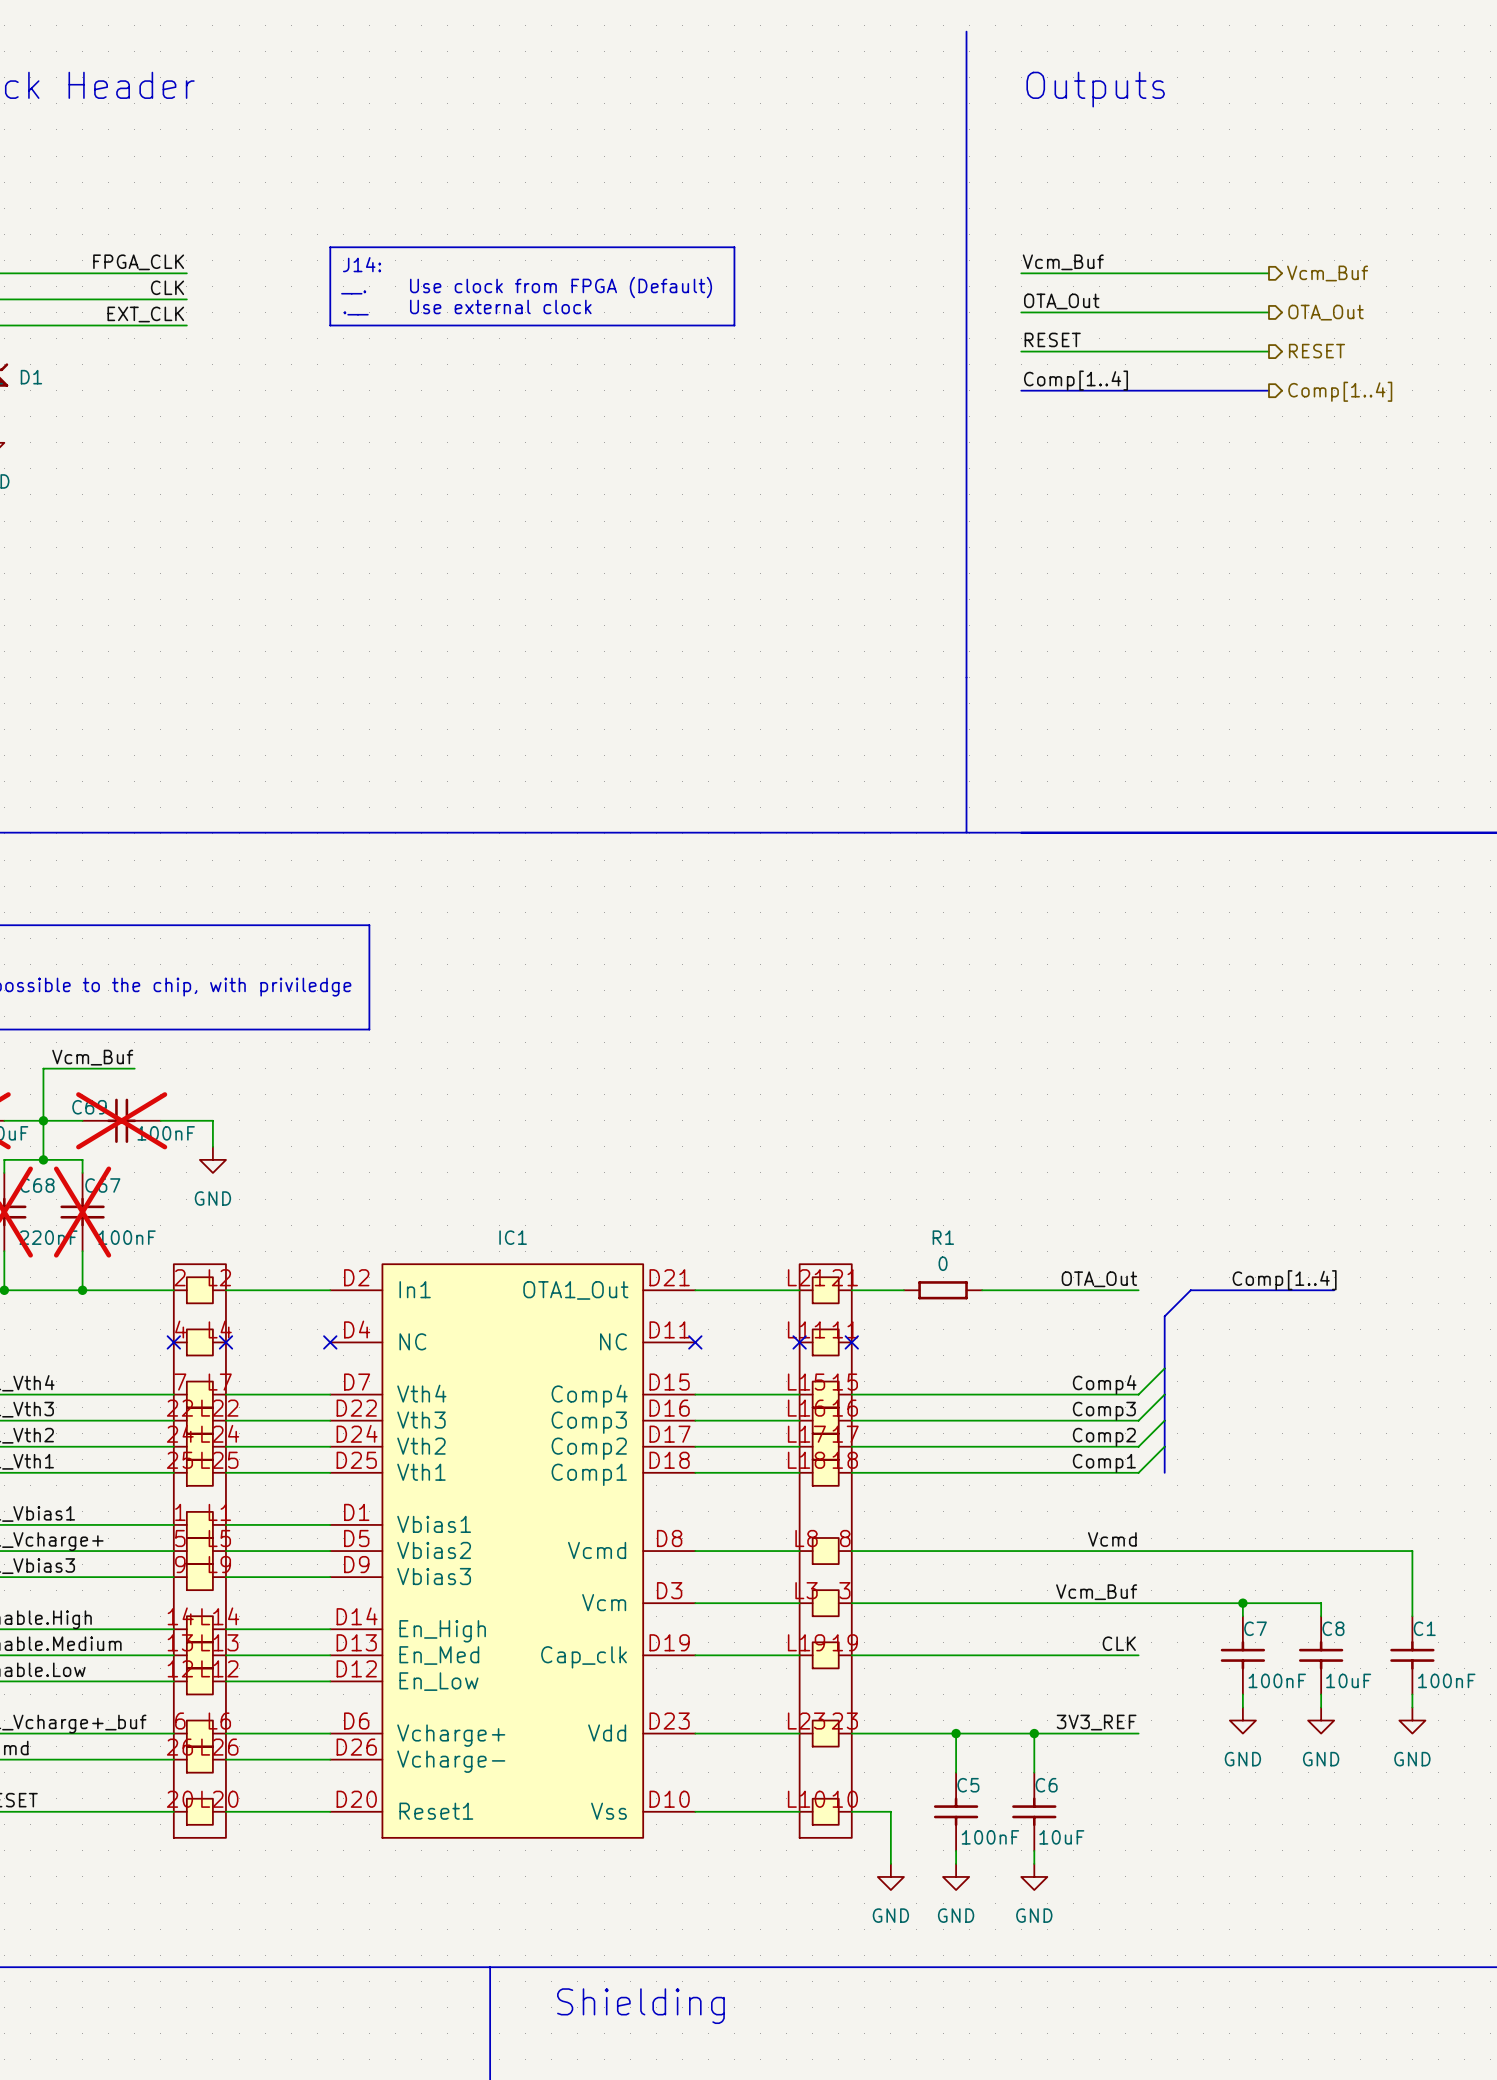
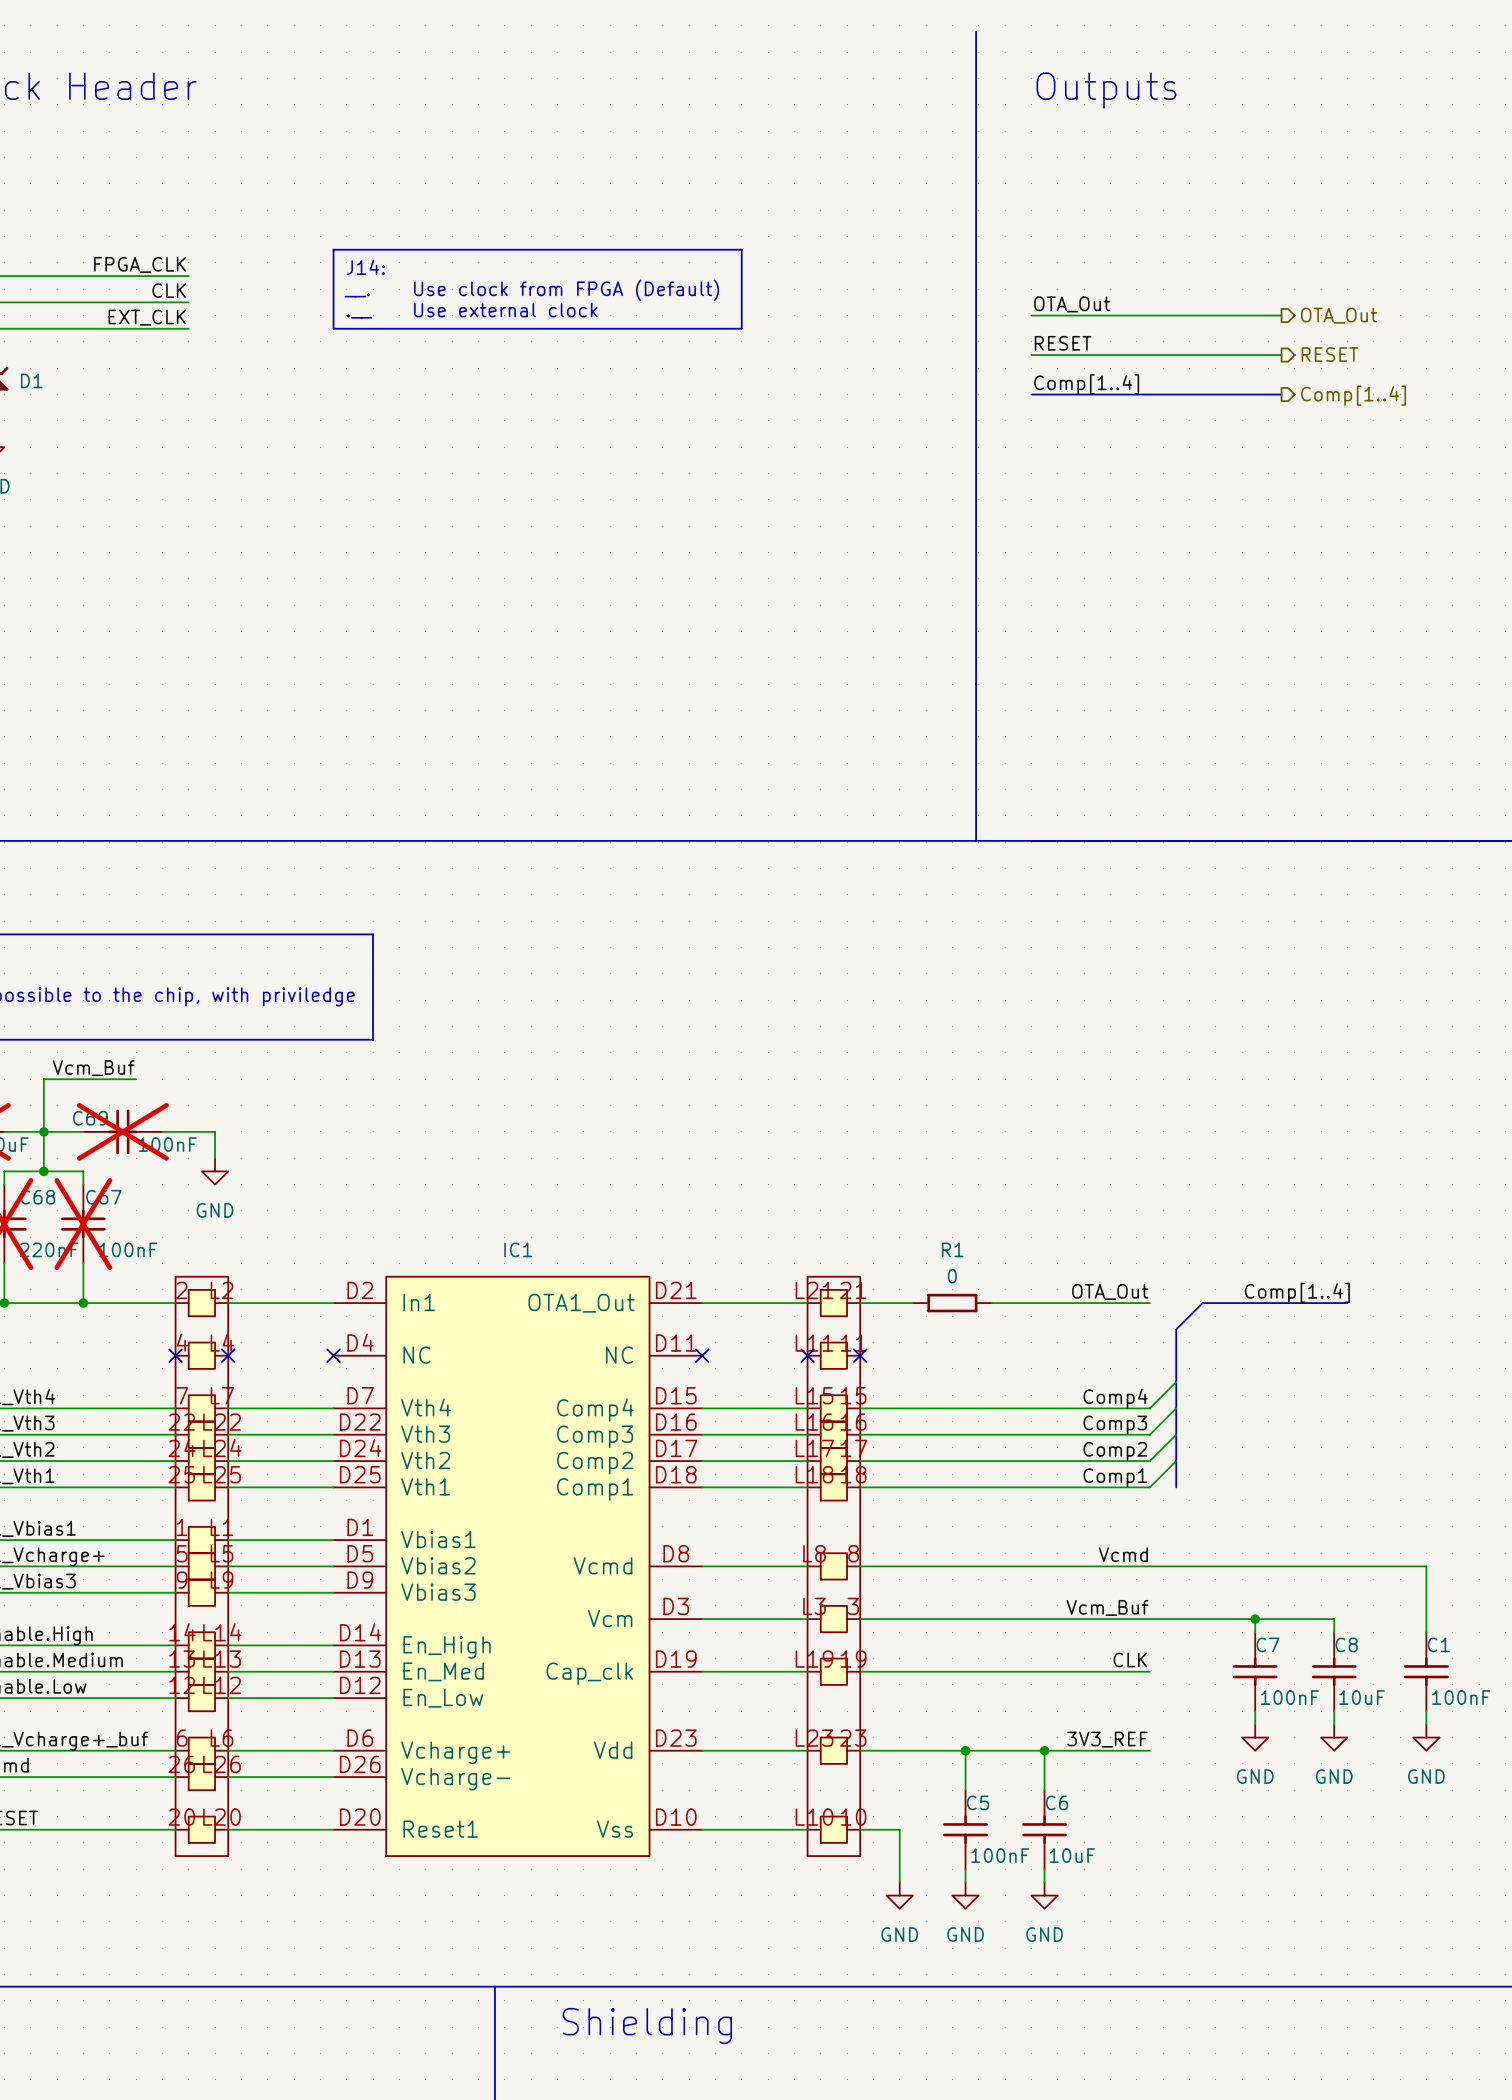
label: Vcm_Buf (1063, 262) -> none
wire: (1021, 273) (1268, 273) -> none
hierarchical label: Vcm_Buf (1327, 273) -> none

